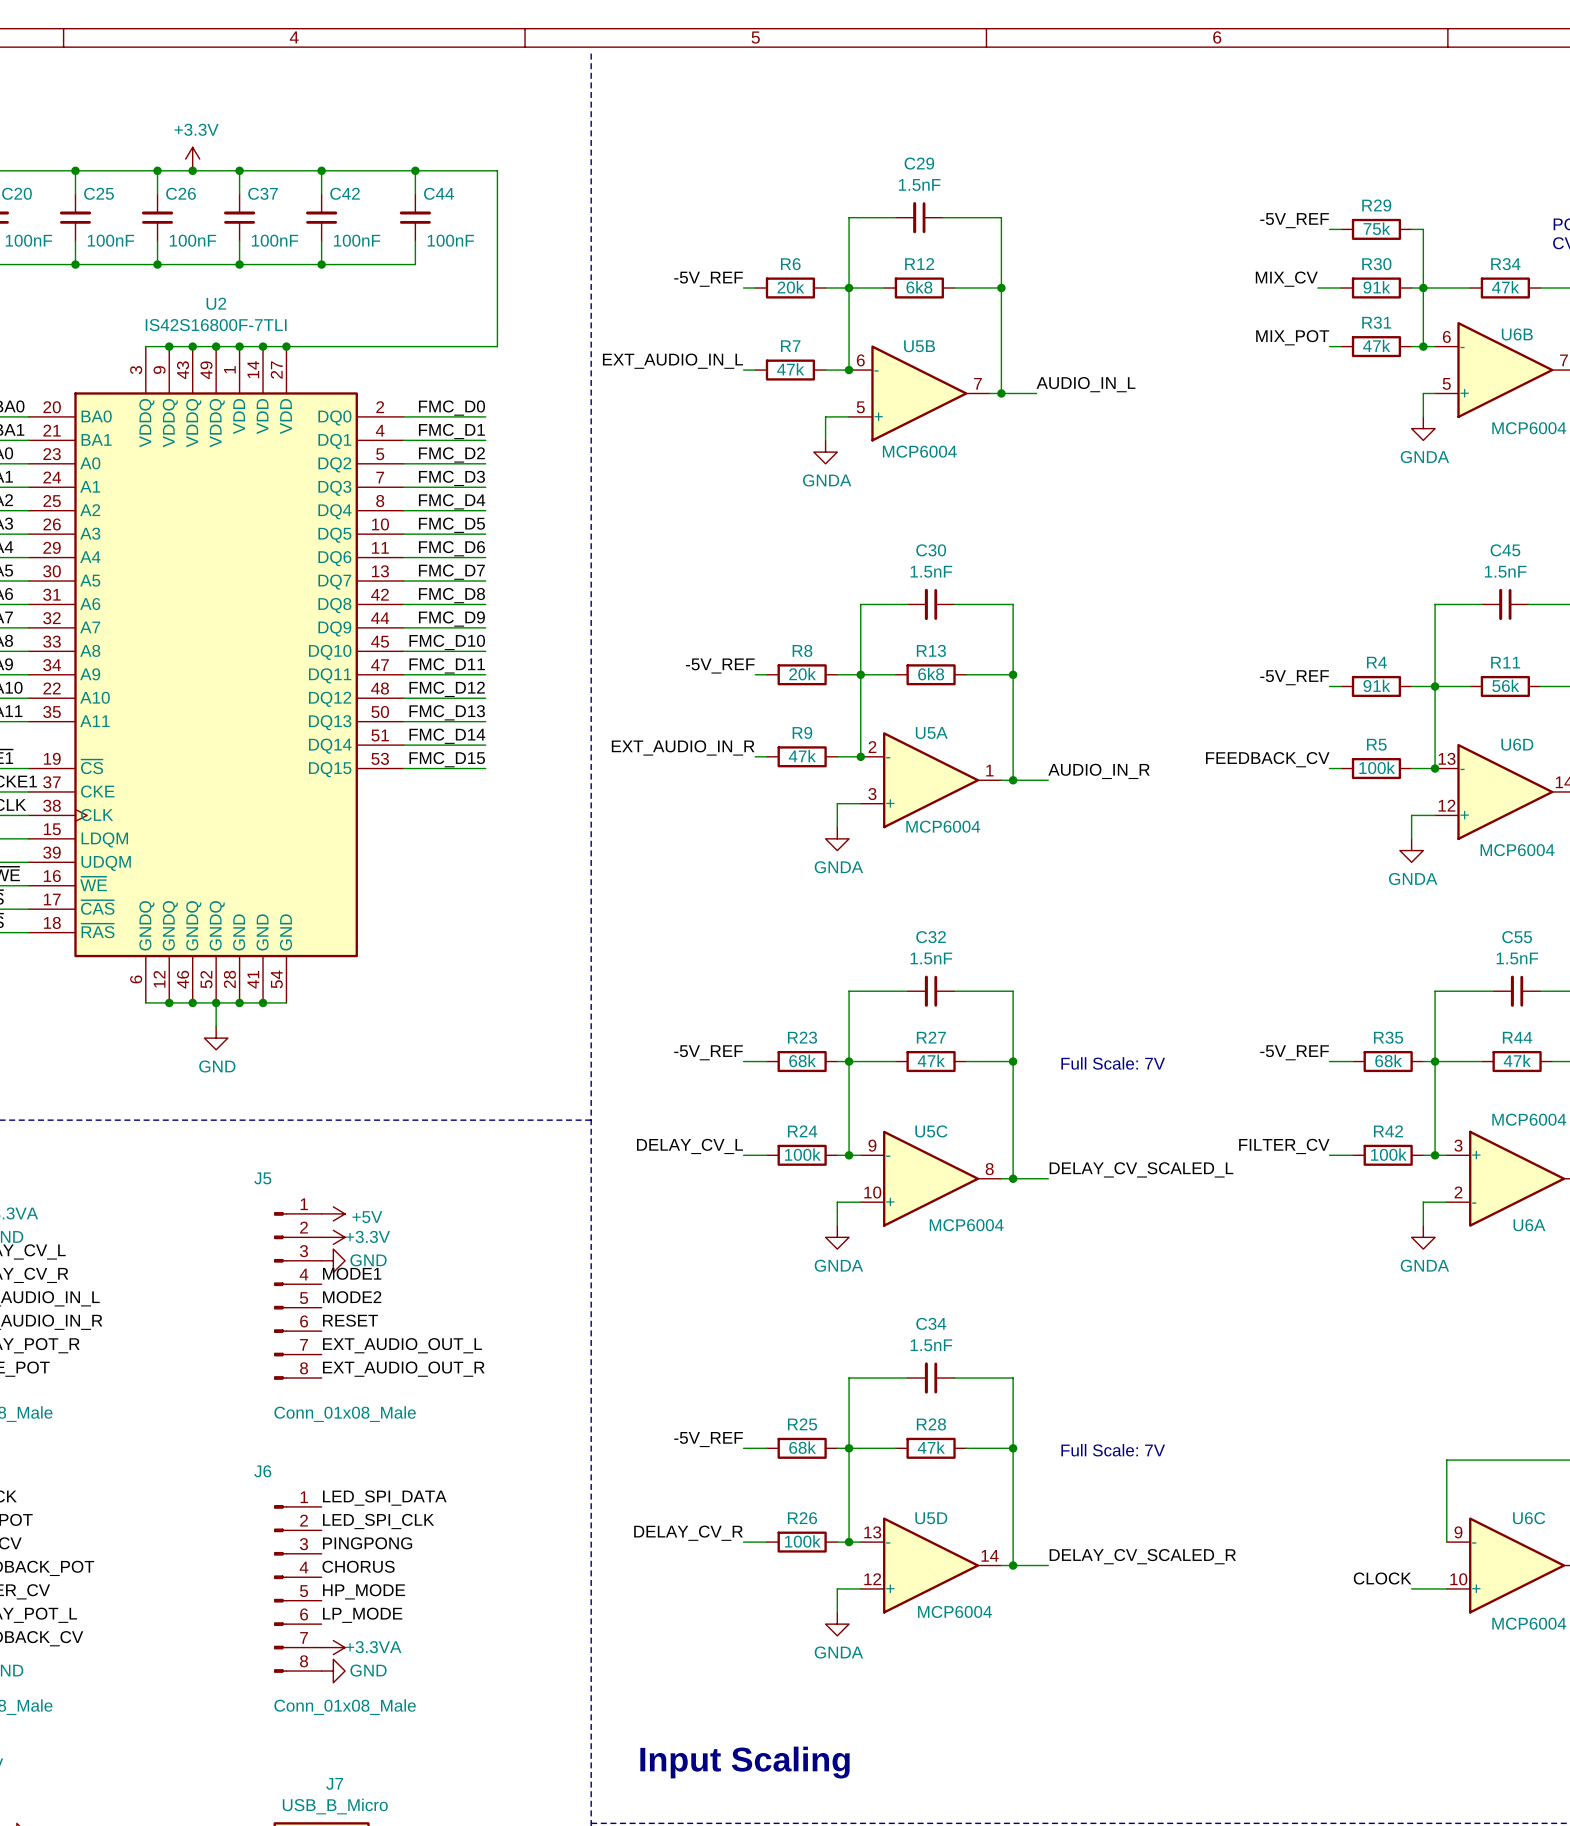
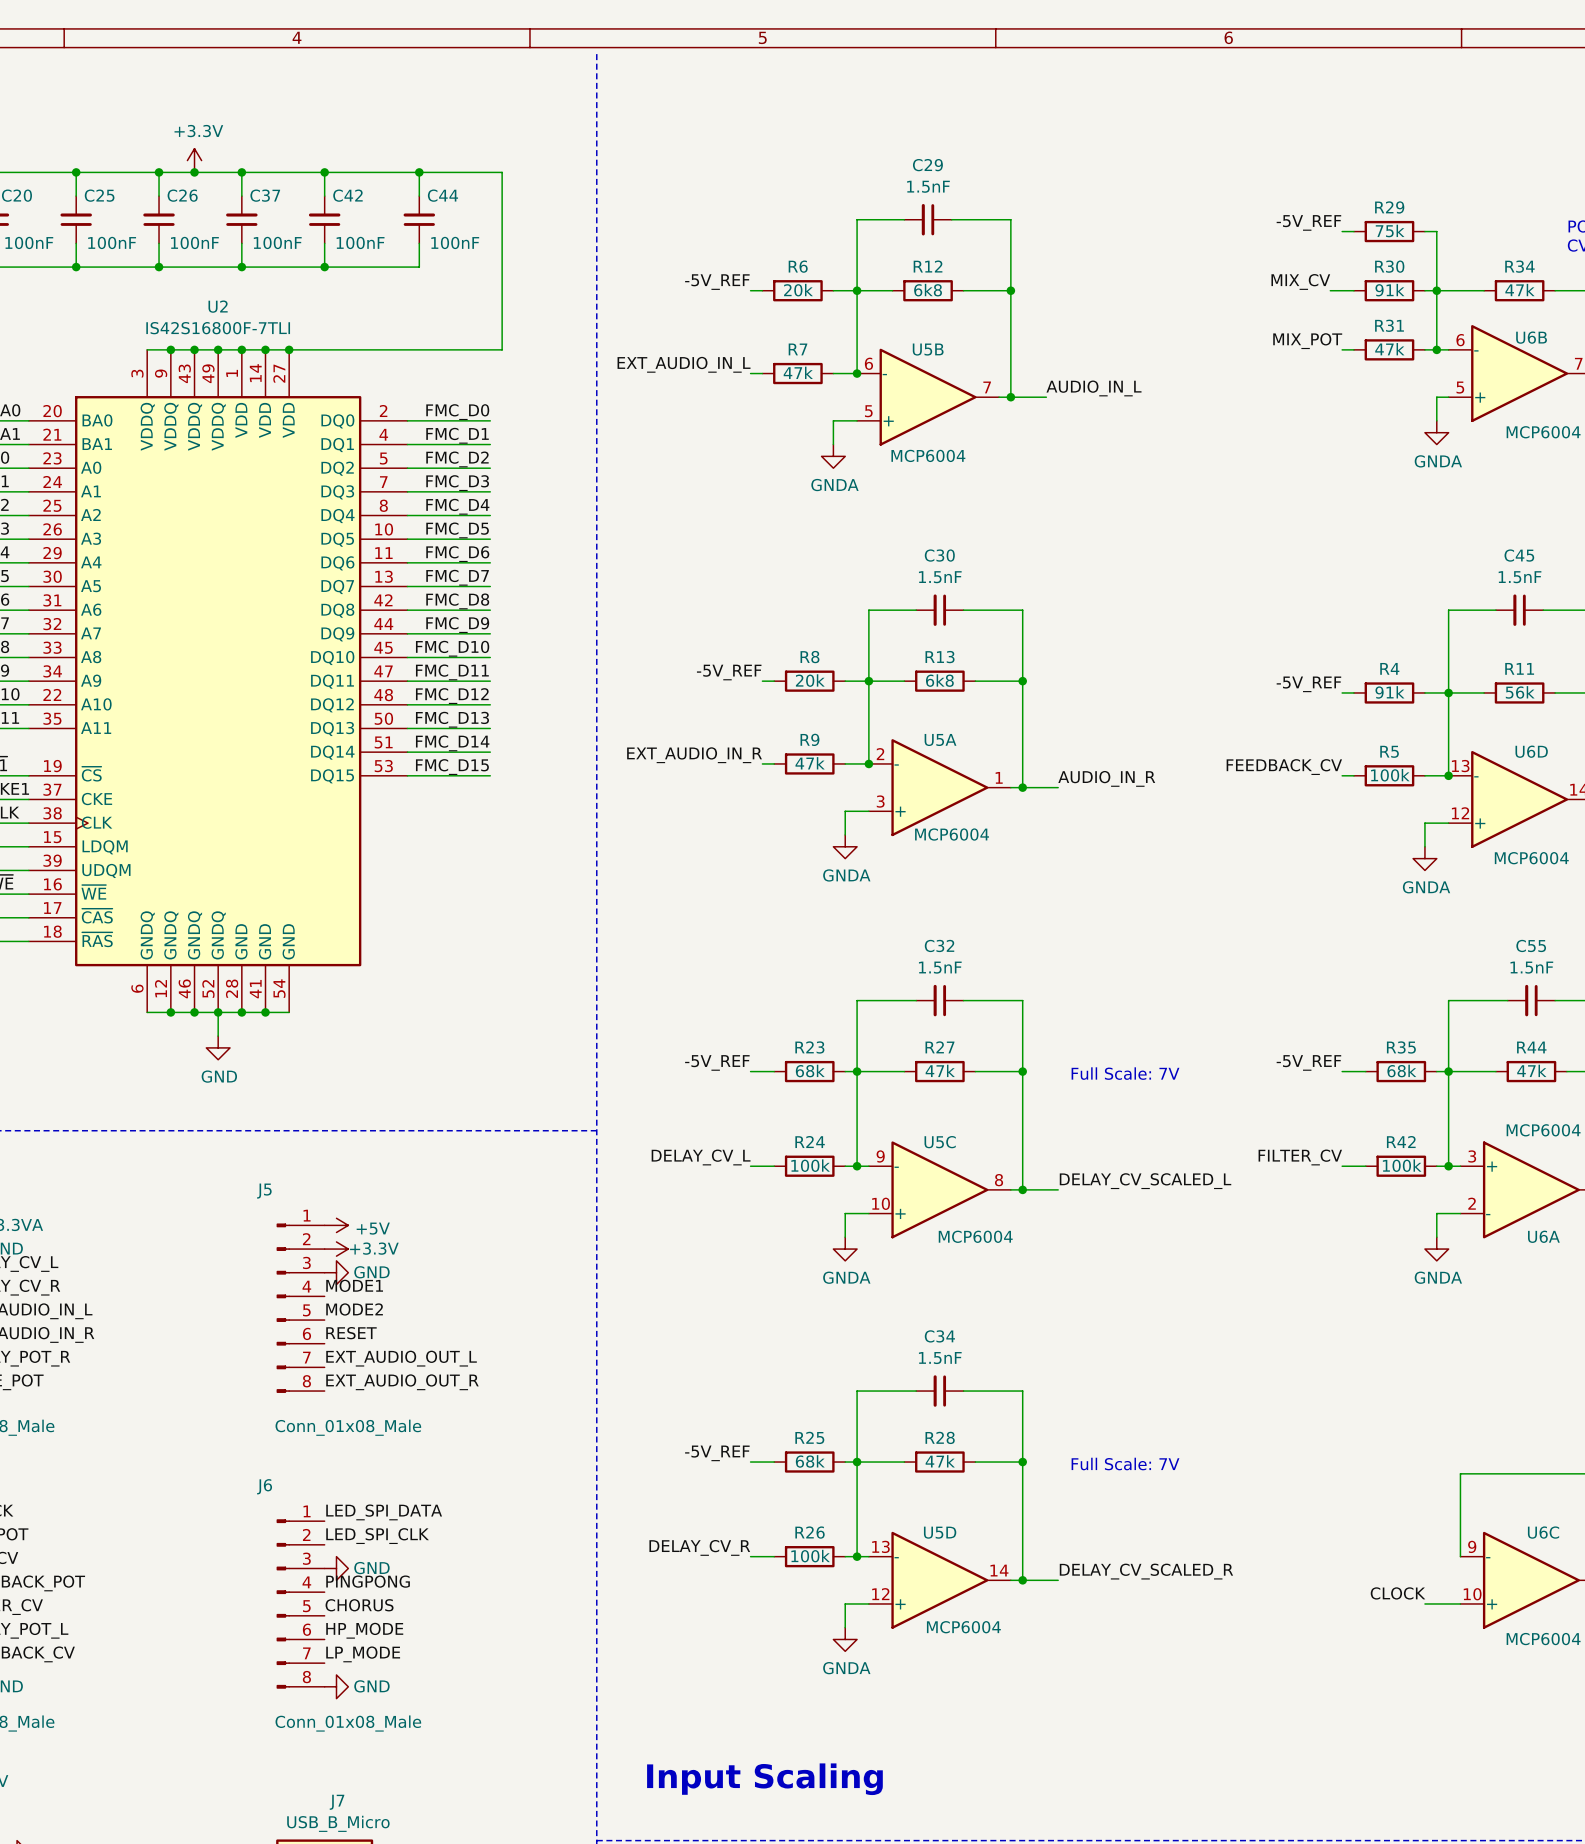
label: PINGPONG (367, 1543) -> none
power symbol: none -> GND (336, 1568)
label: CHORUS (358, 1566) -> PINGPONG (368, 1581)
label: HP_MODE (364, 1591) -> CHORUS (359, 1605)
label: LP_MODE (362, 1615) -> HP_MODE (364, 1630)
label: none -> LP_MODE (363, 1654)
power symbol: +3.3VA (333, 1647) -> none

